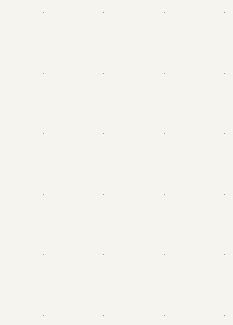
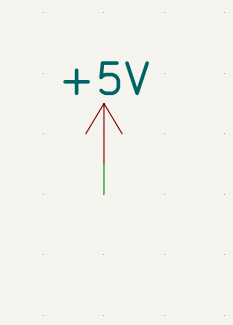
power symbol: none -> +5V (103, 133)
wire: none -> (103, 163) (103, 194)

